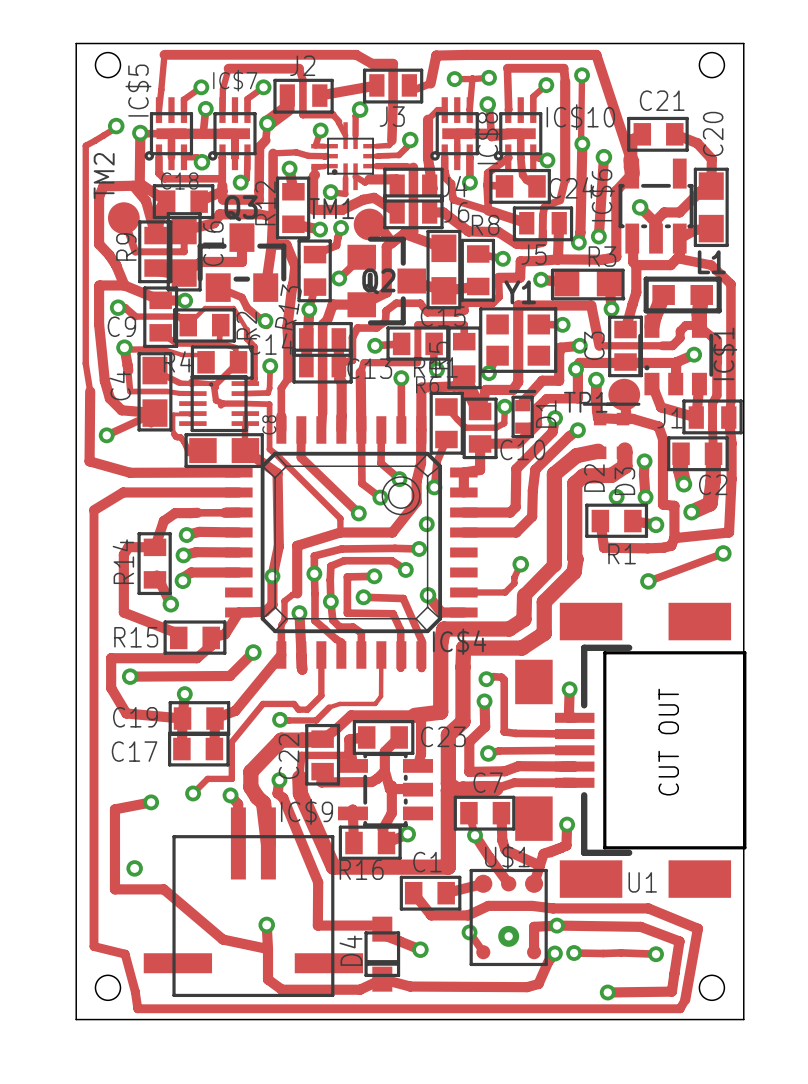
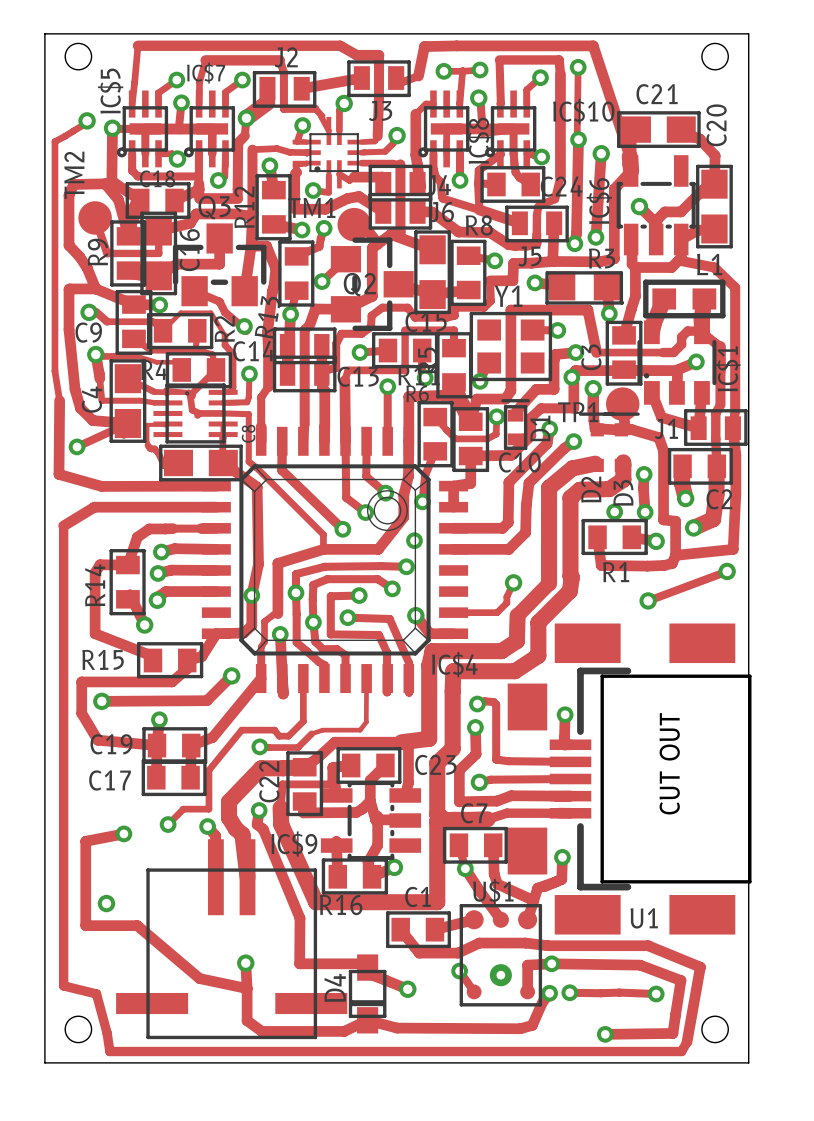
C21 footprint: [627, 116, 689, 152] -> [617, 111, 701, 149]

